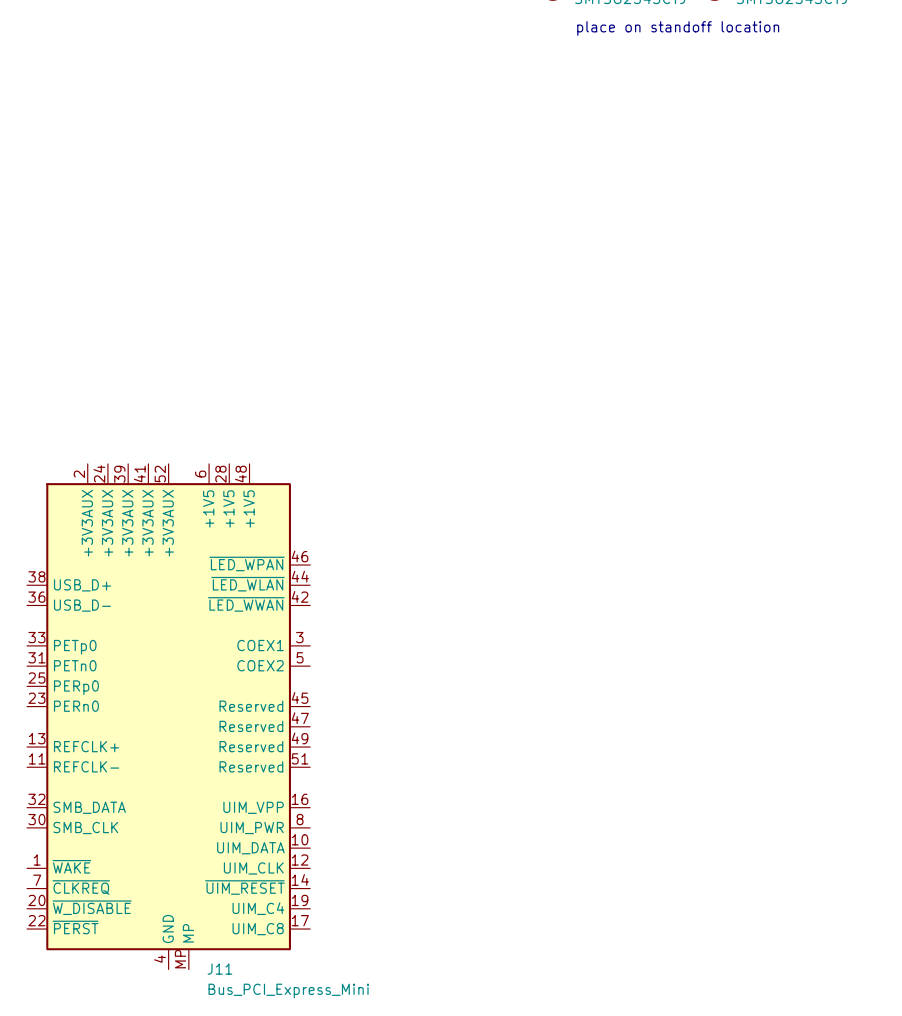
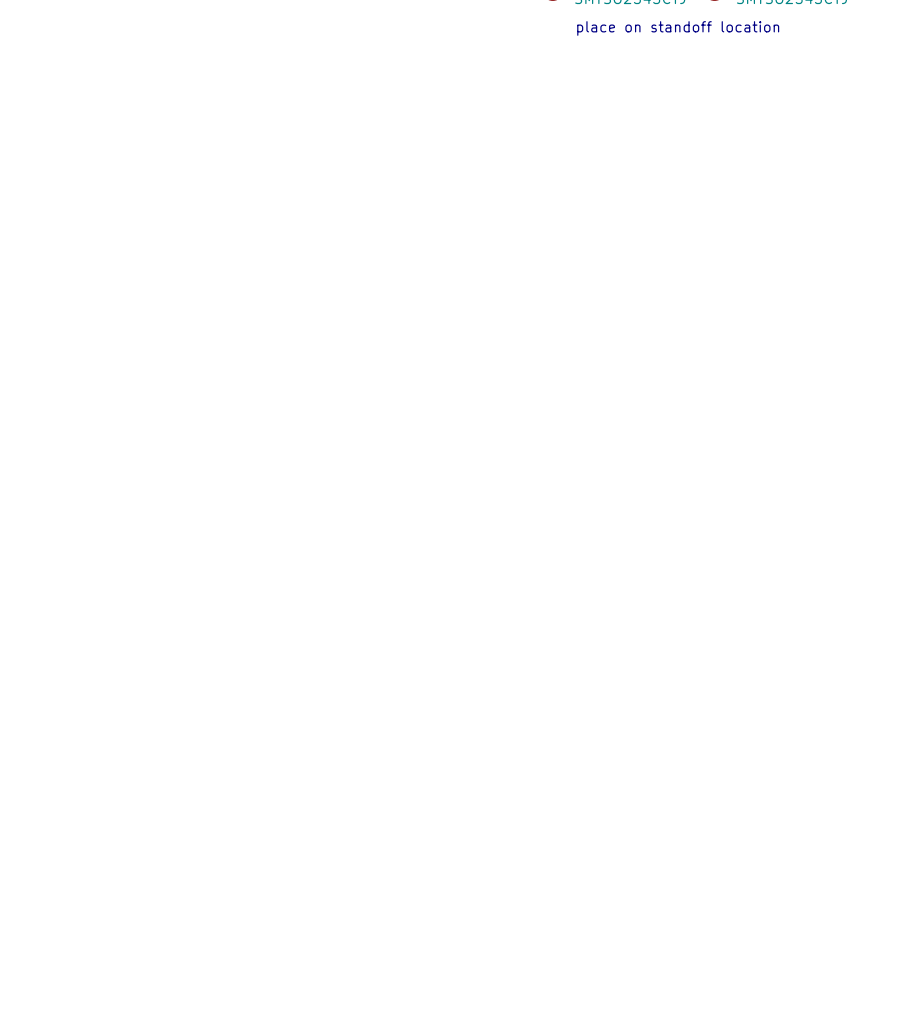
J11: Bus_PCI_Express_Mini (168, 716) -> none

